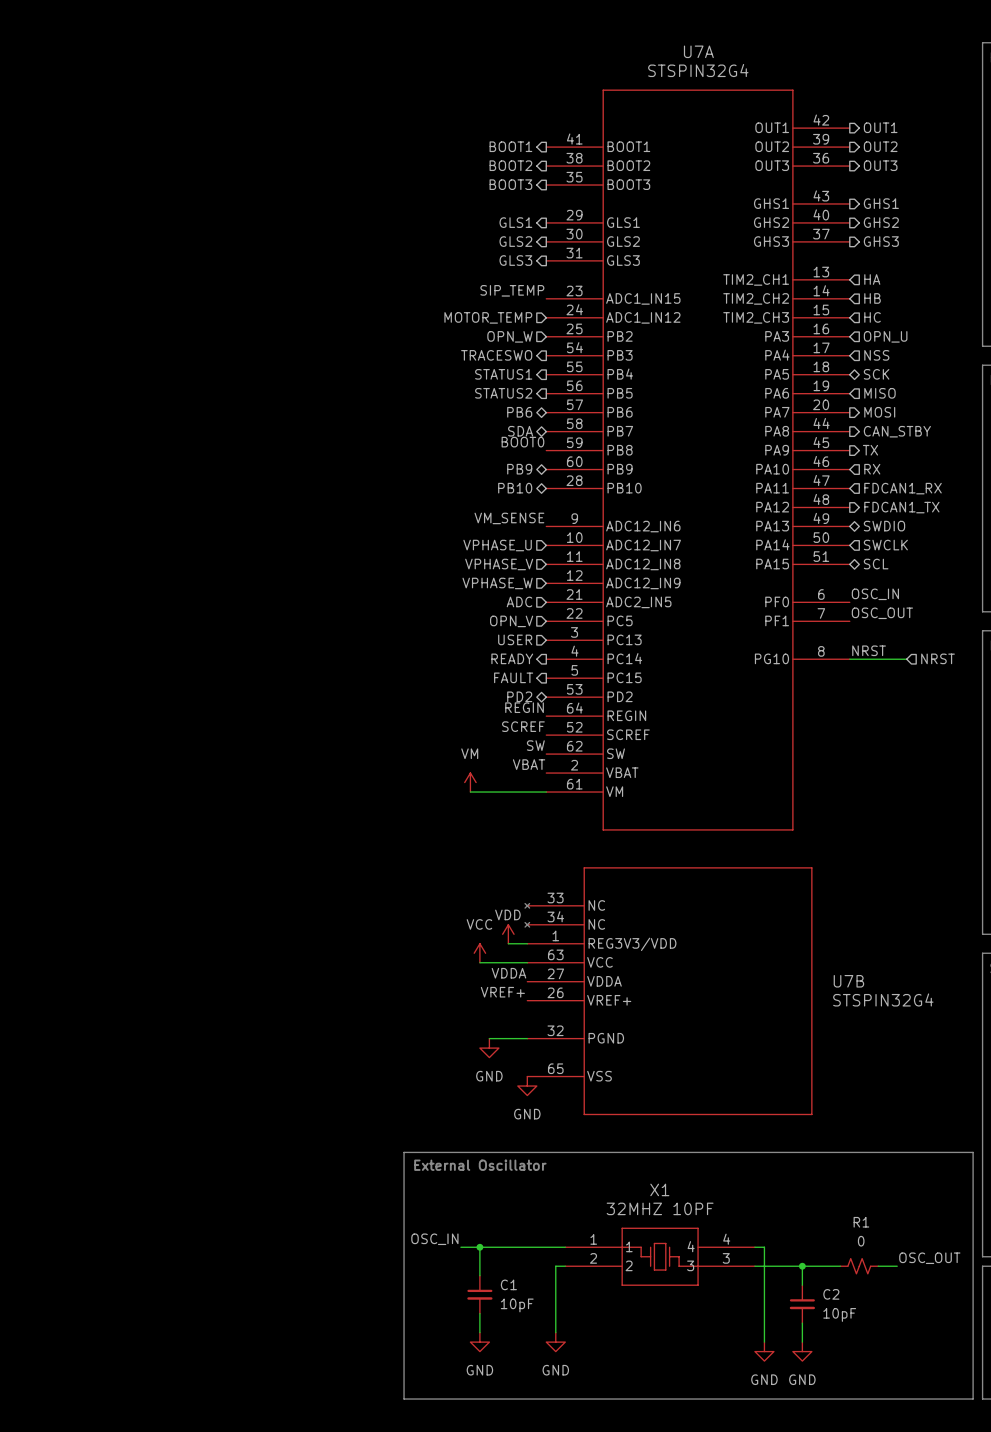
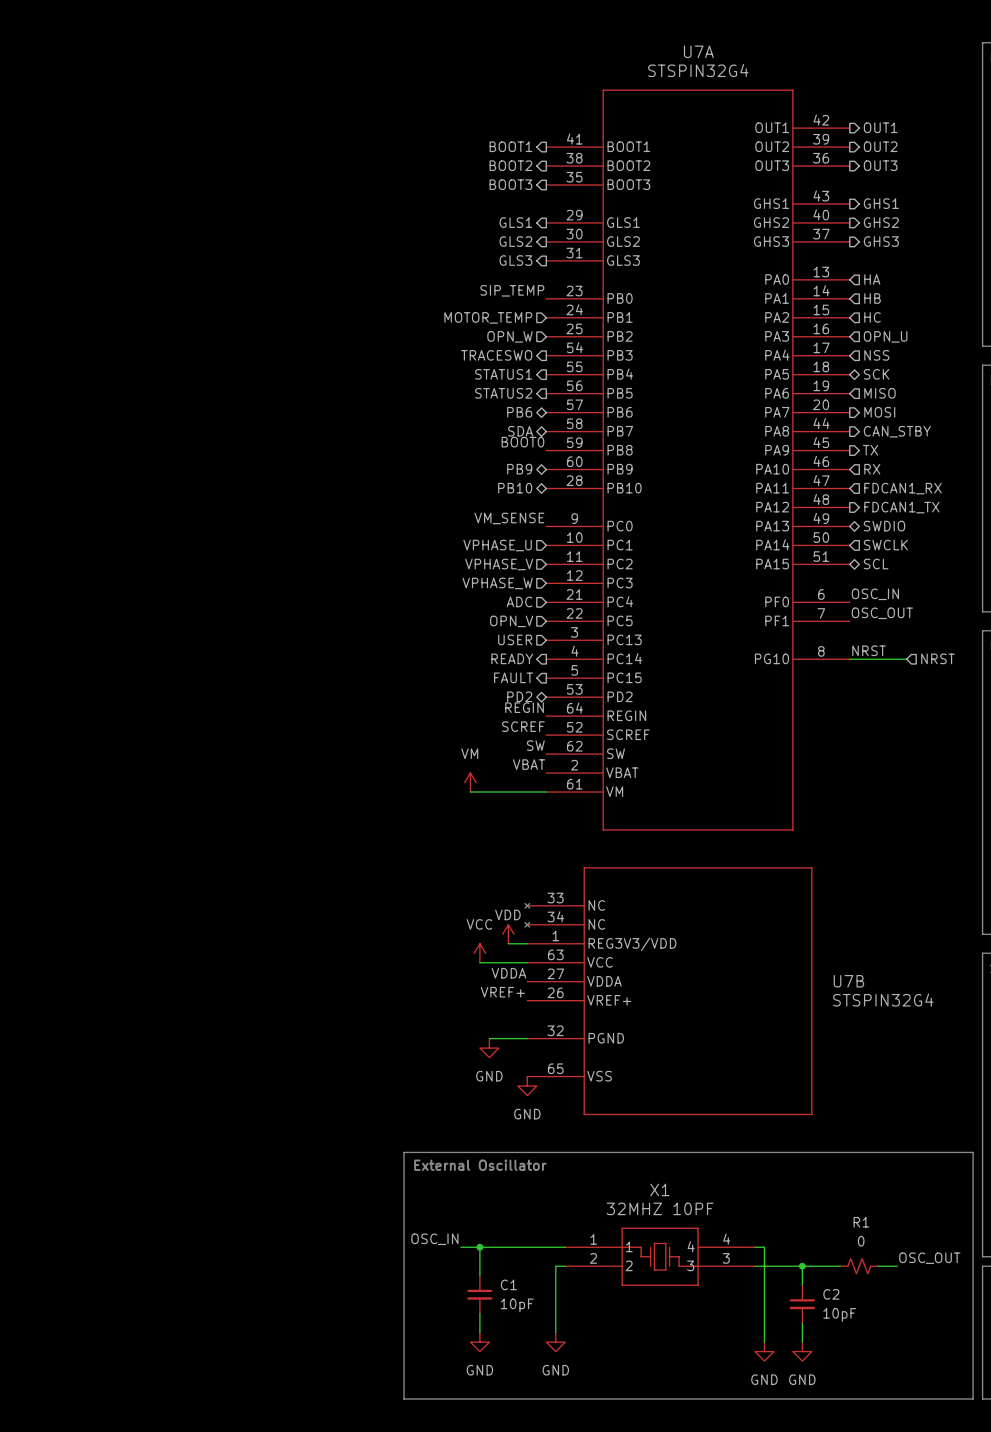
U7A symbol: [546, 89, 850, 831] -> [546, 89, 850, 831]

